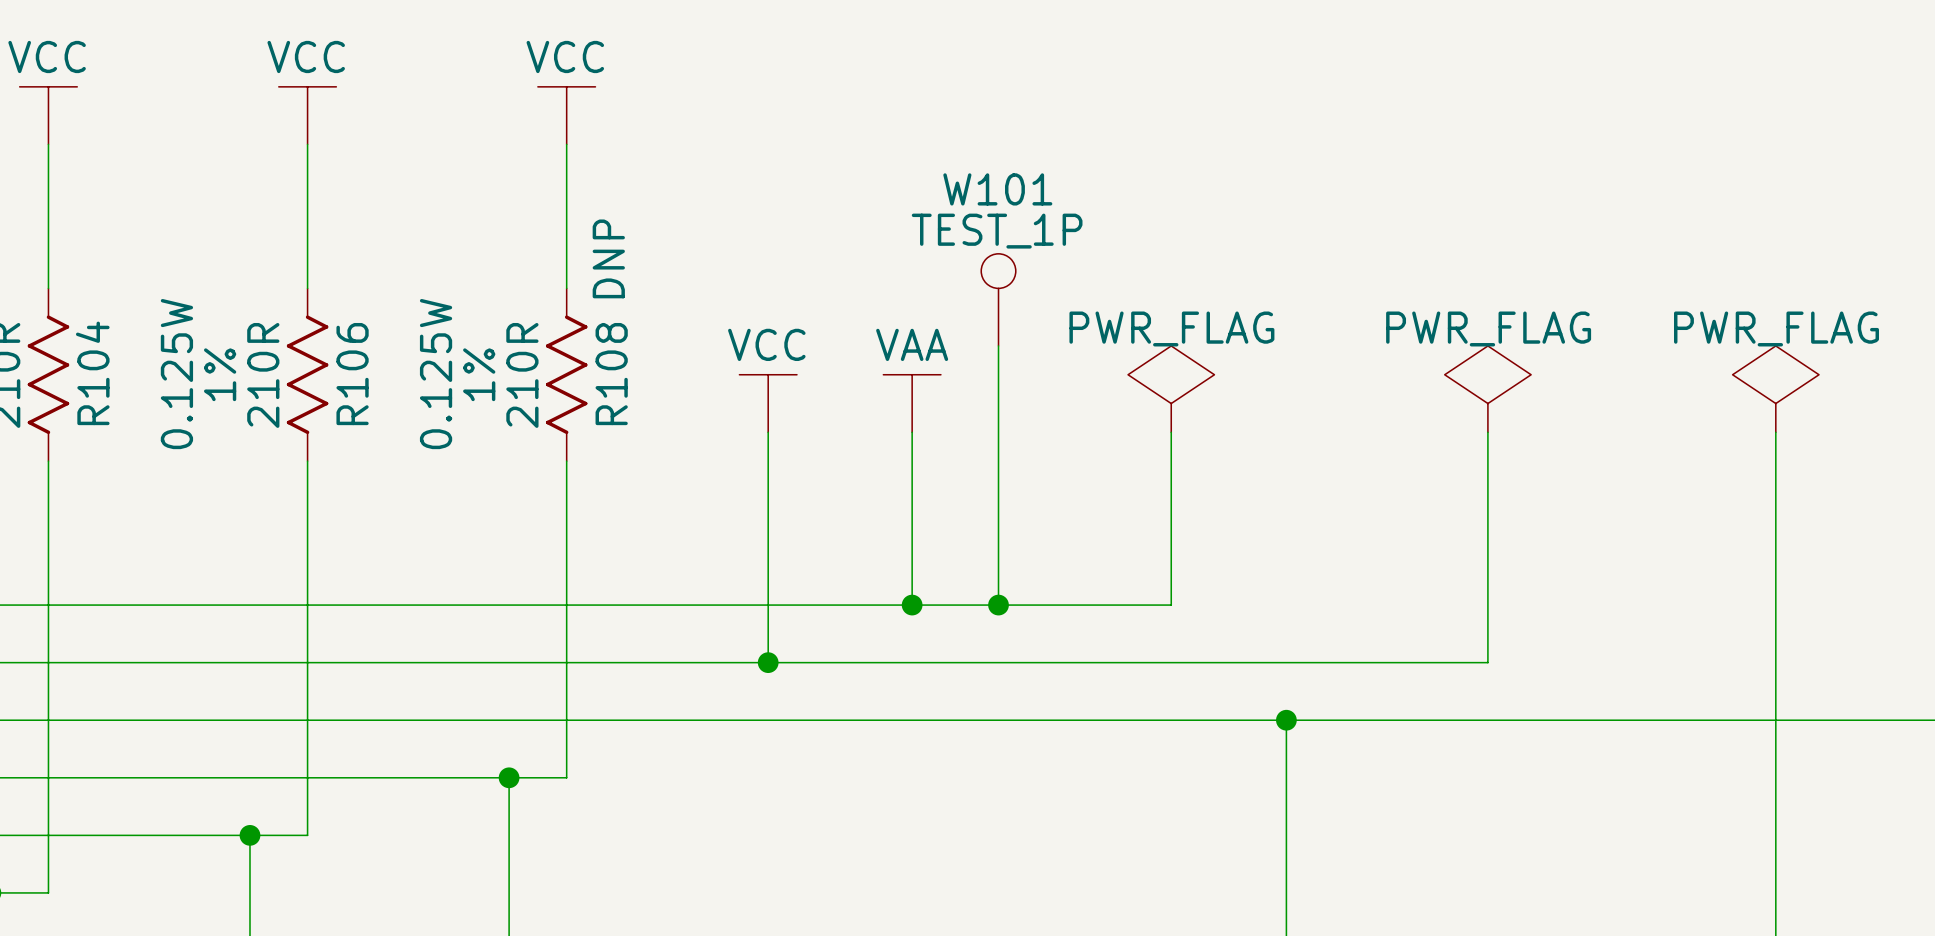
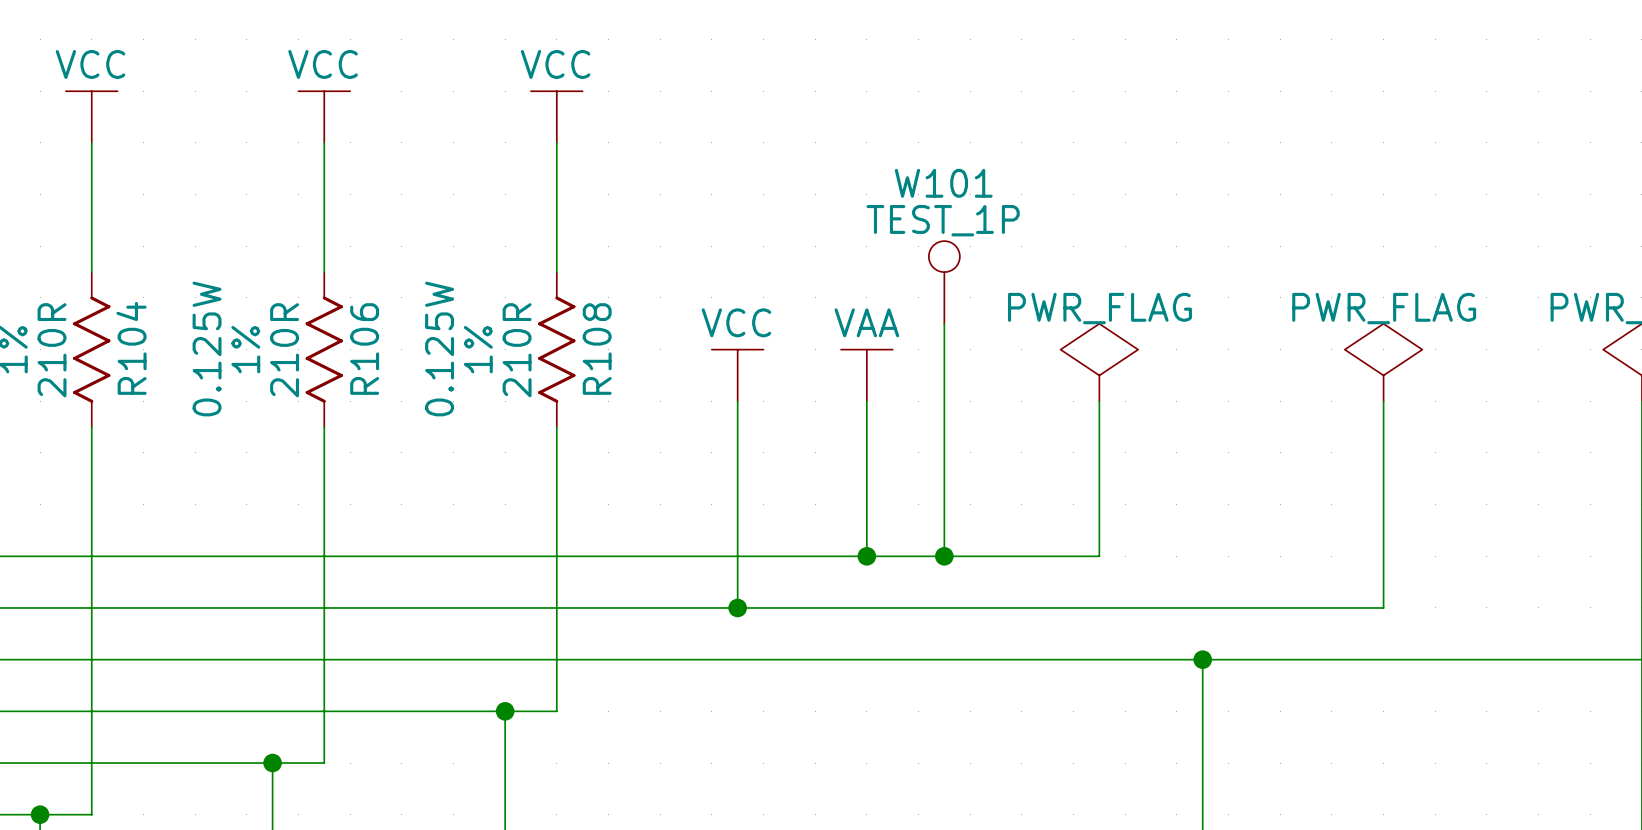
R108 text: DNP (608, 258) -> none

